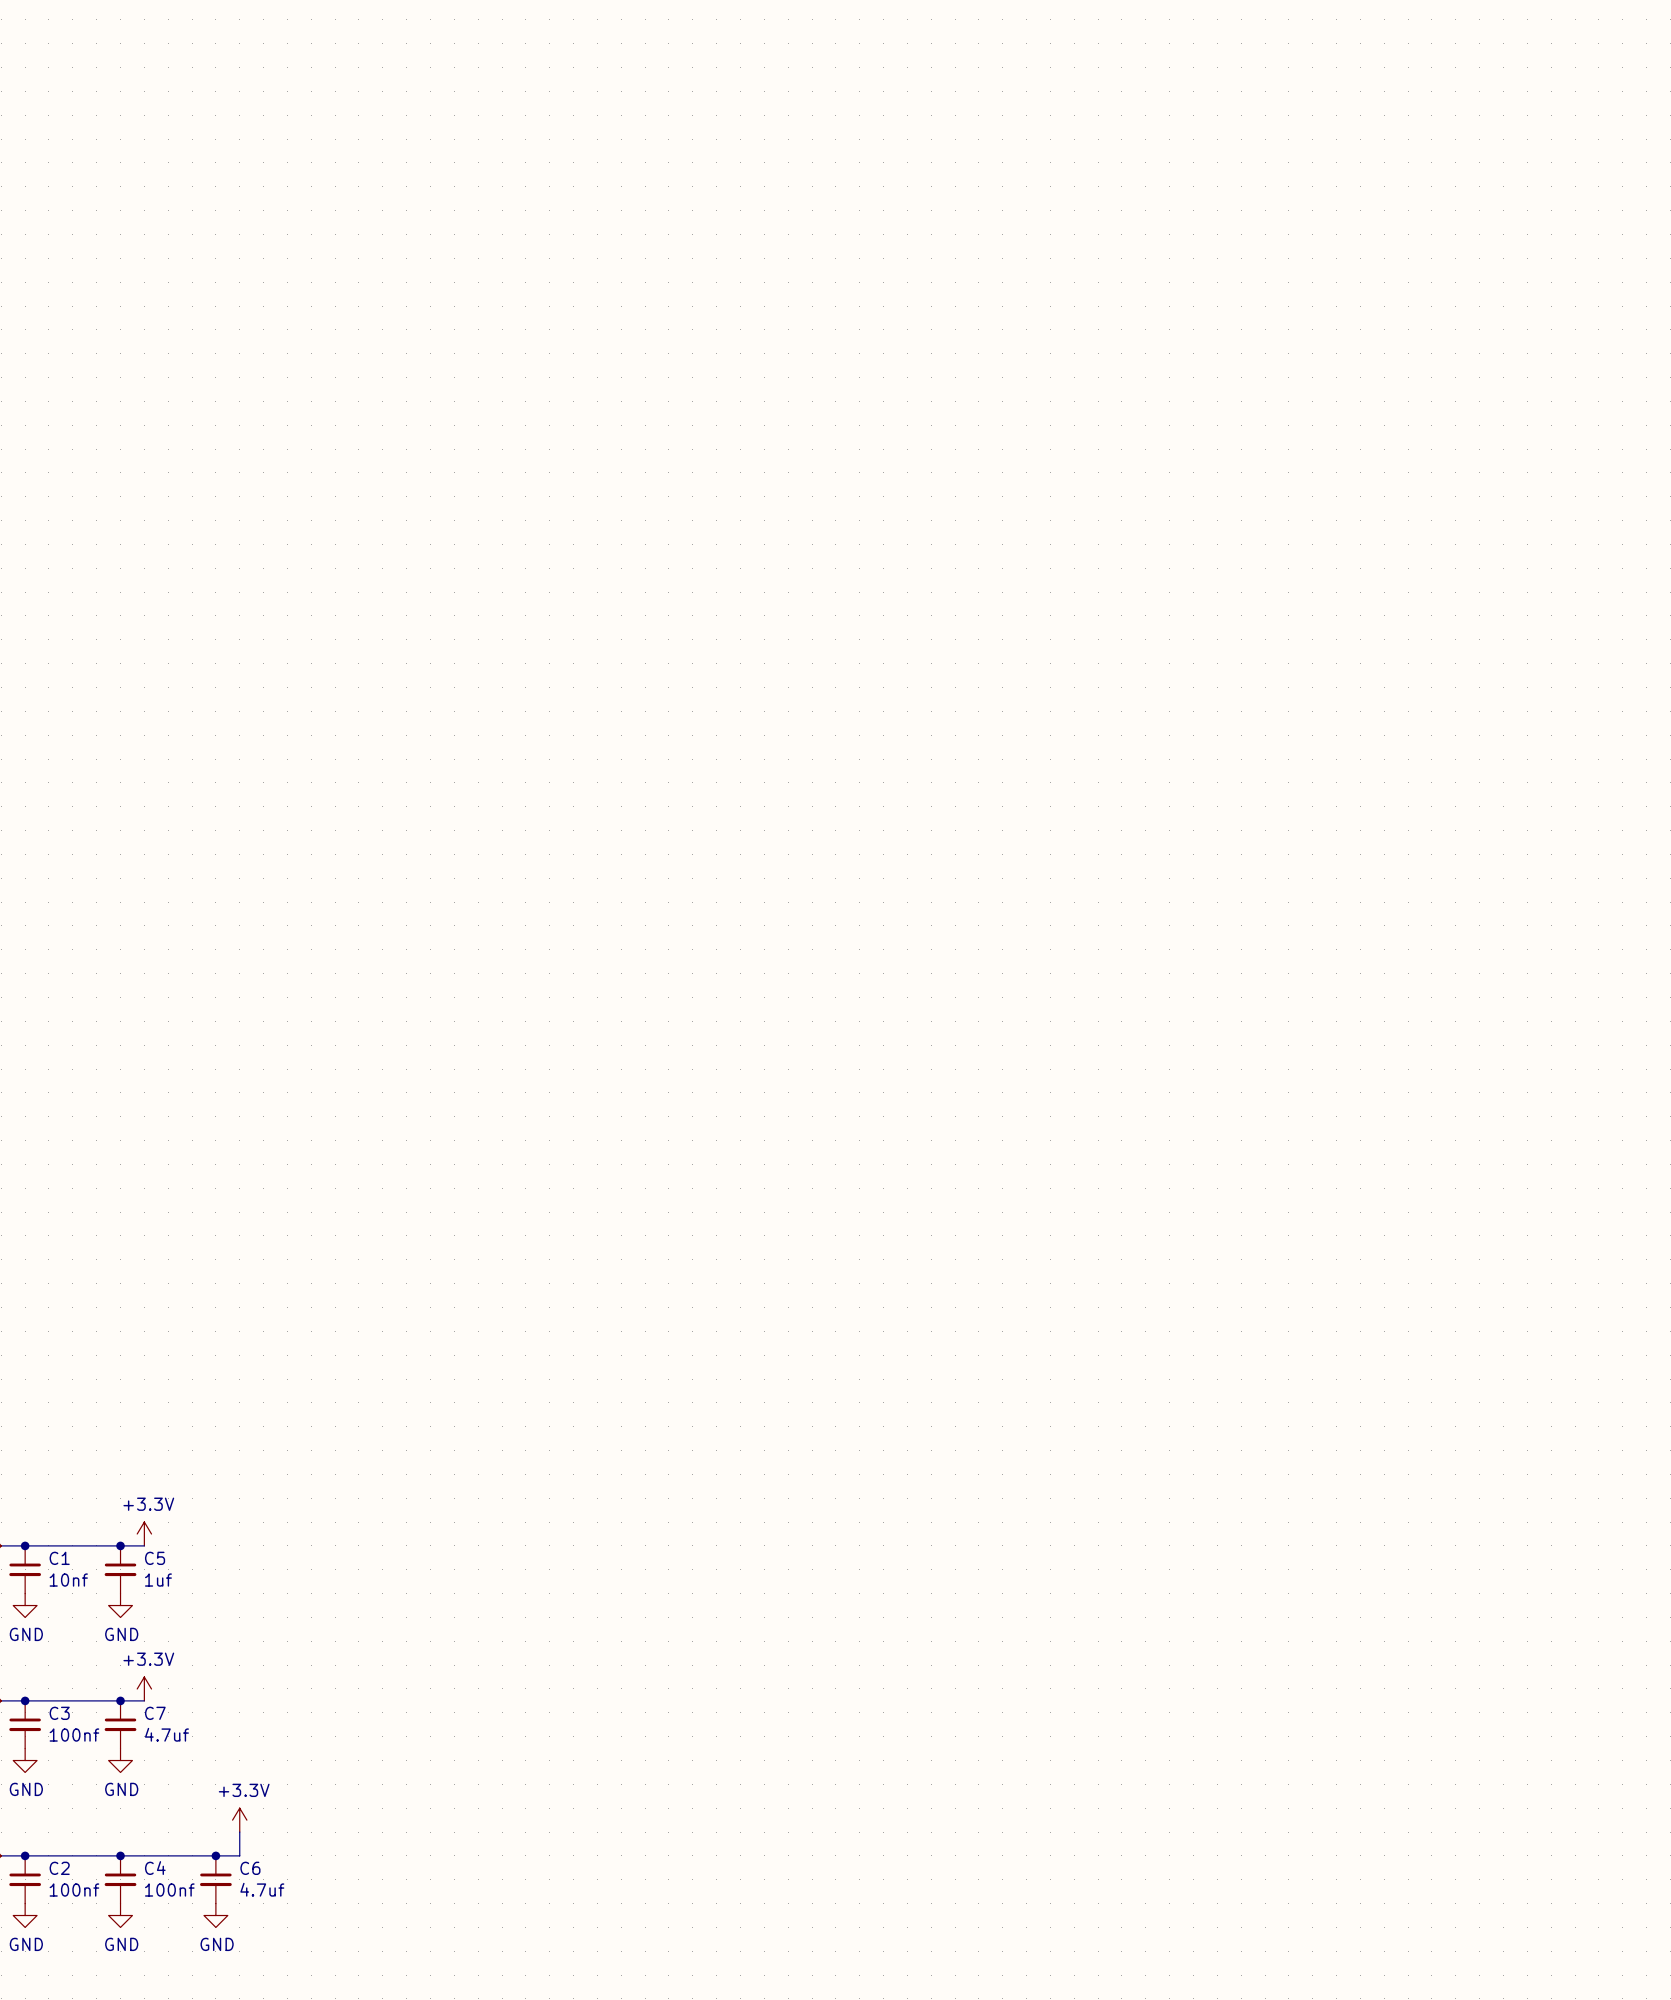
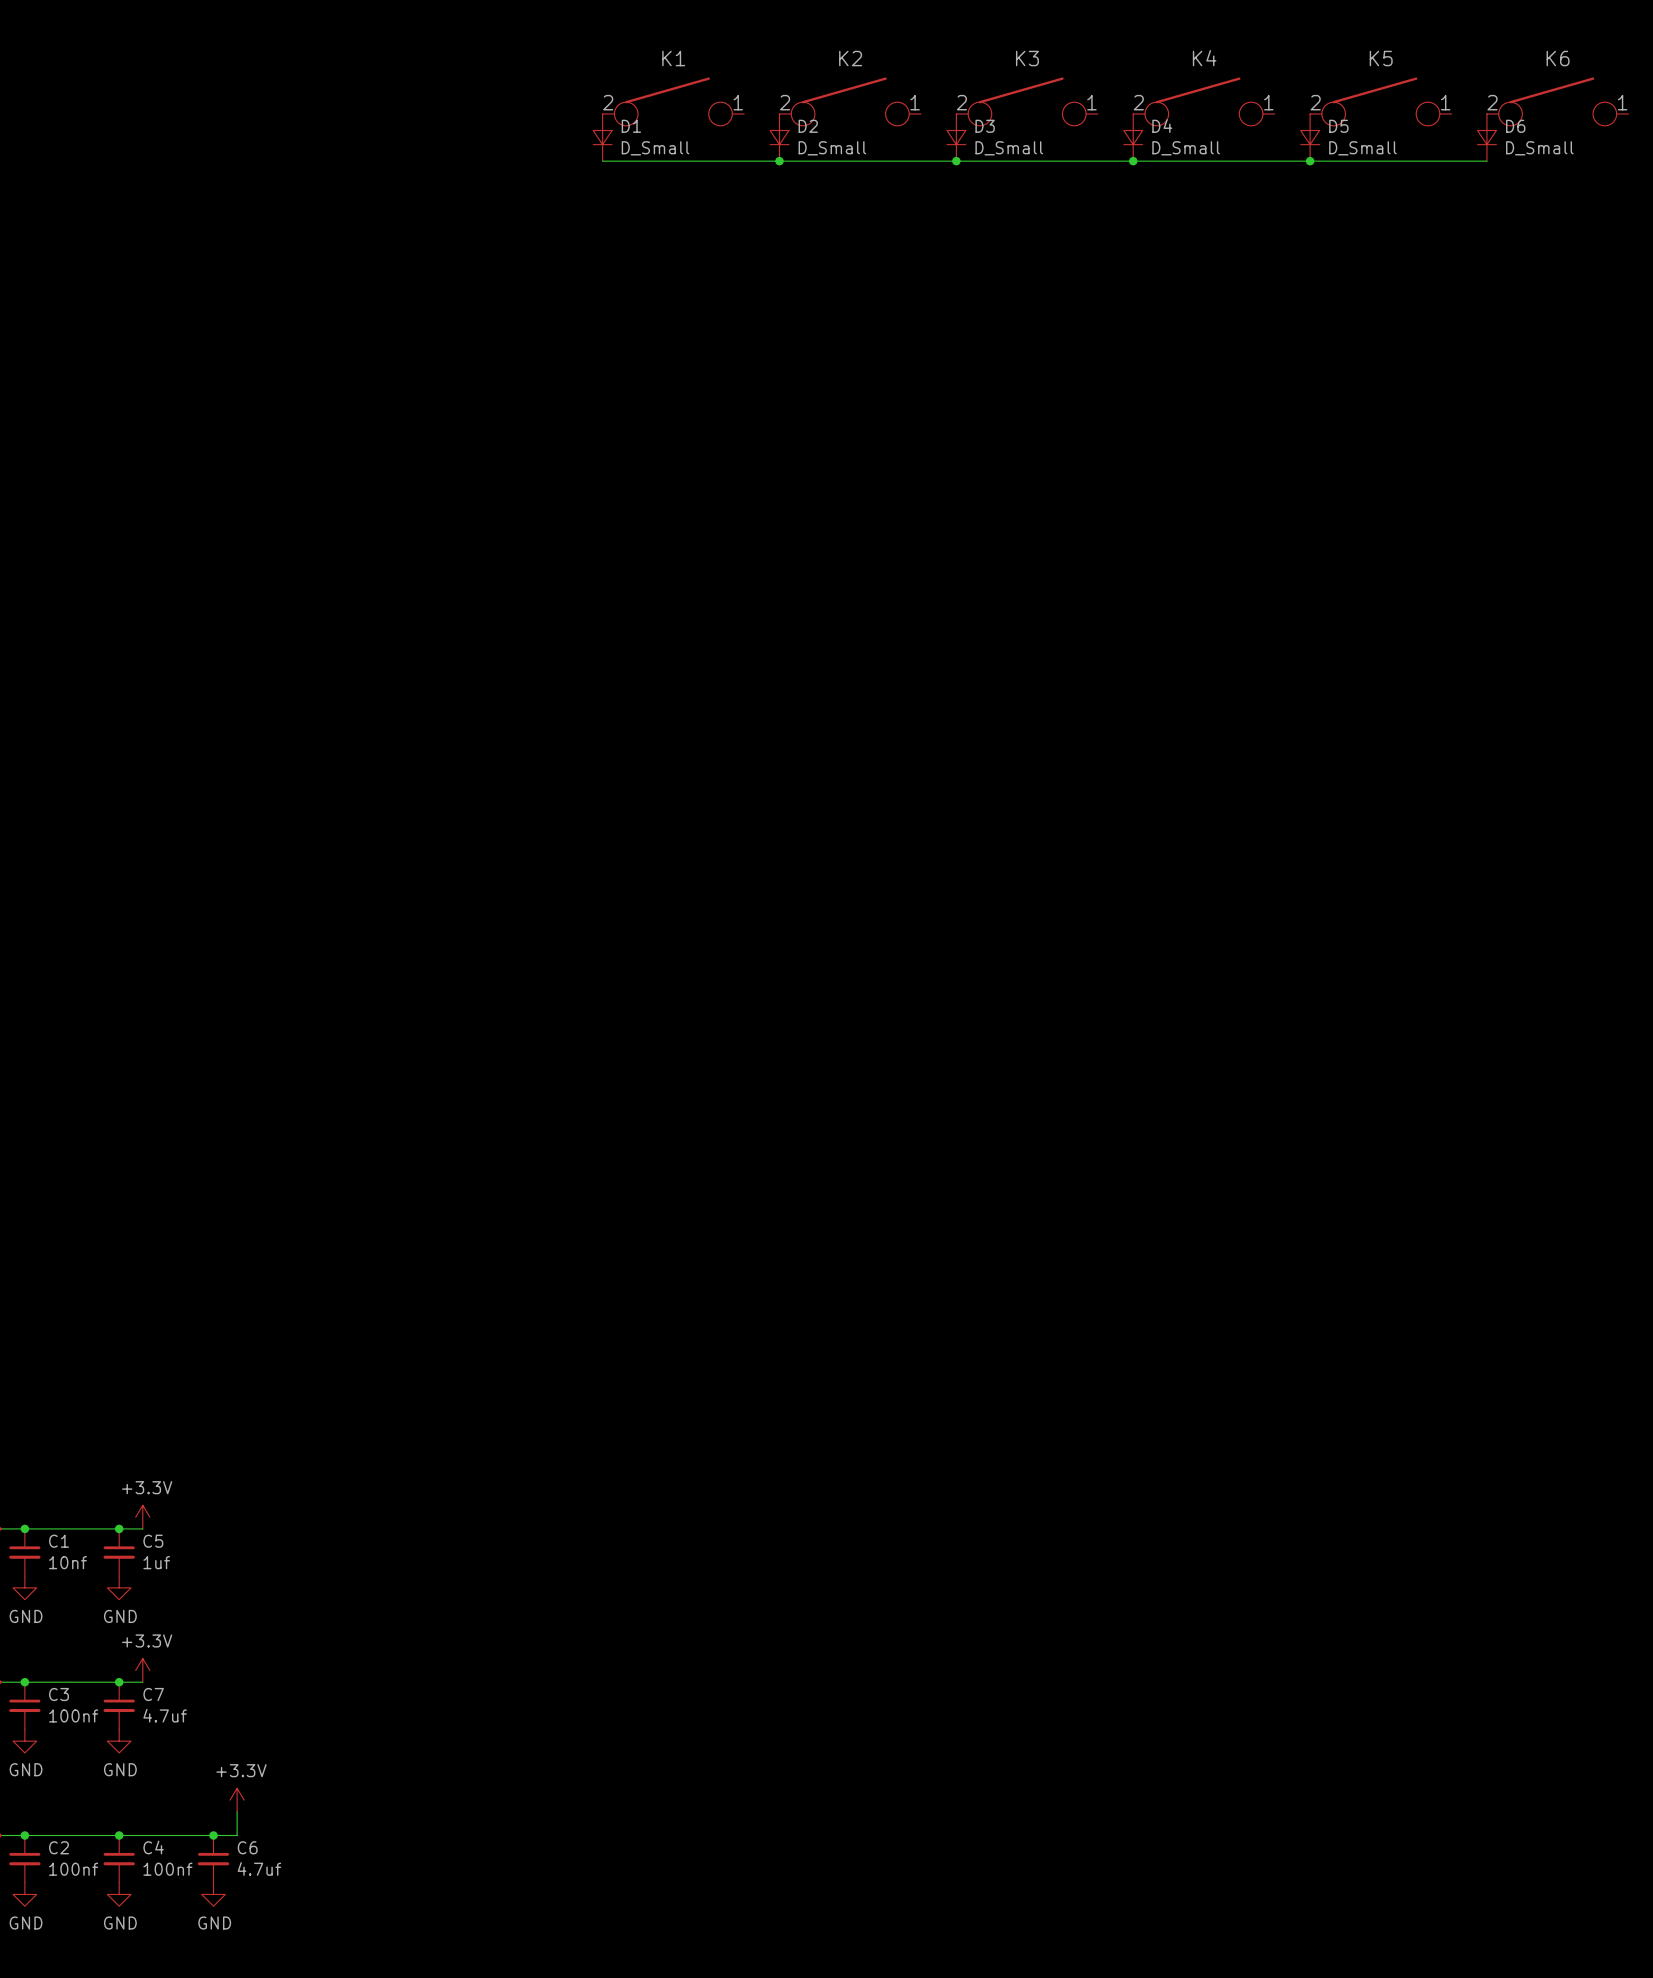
K1: none -> (673, 101)
K2: none -> (850, 101)
K3: none -> (1027, 101)
K4: none -> (1203, 101)
K5: none -> (1380, 101)
K6: none -> (1557, 101)
D1: none -> D_Small (602, 137)
D2: none -> D_Small (779, 137)
D3: none -> D_Small (956, 137)
D4: none -> D_Small (1133, 137)
D5: none -> D_Small (1310, 137)
D6: none -> D_Small (1486, 137)
wire: none -> (602, 161) (1486, 161)
junction: none -> (779, 161)
junction: none -> (956, 161)
junction: none -> (1133, 161)
junction: none -> (1310, 161)

